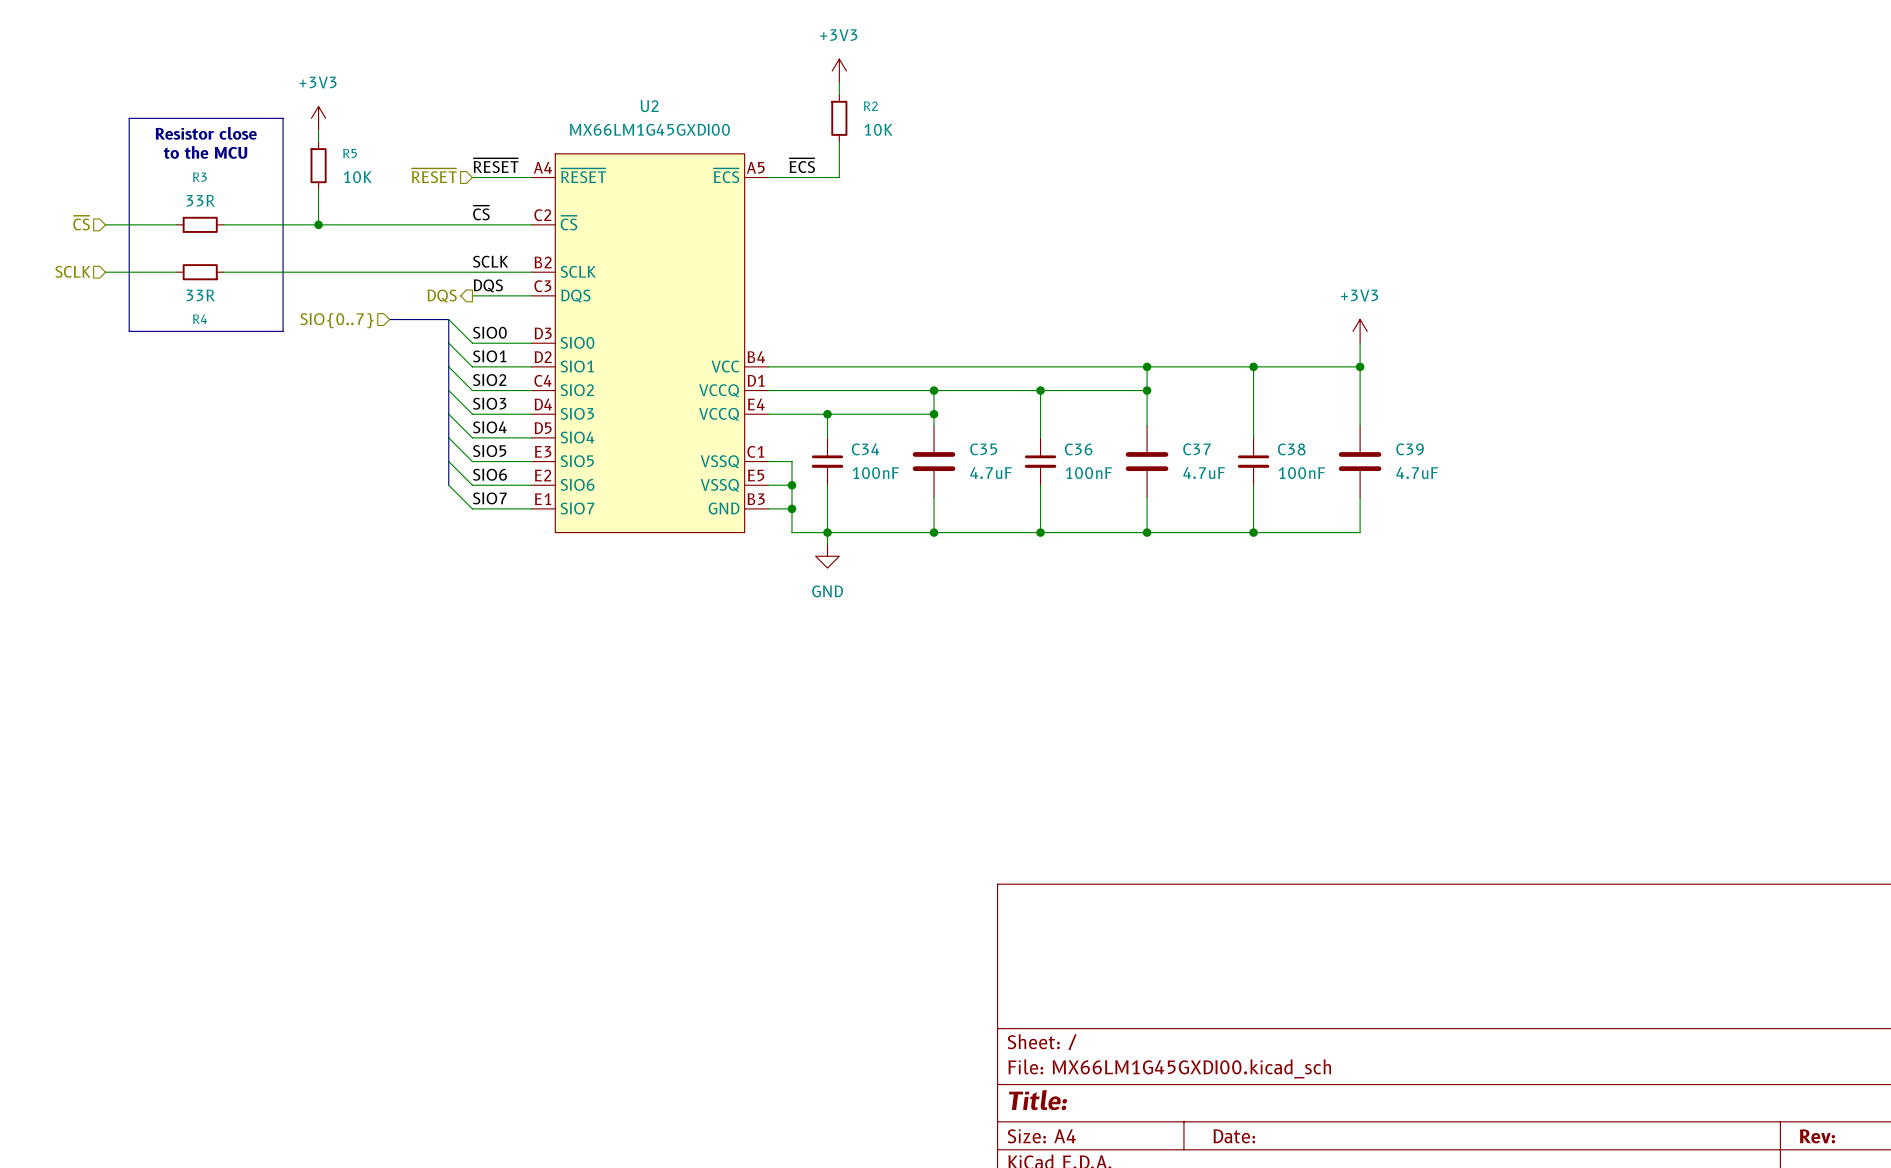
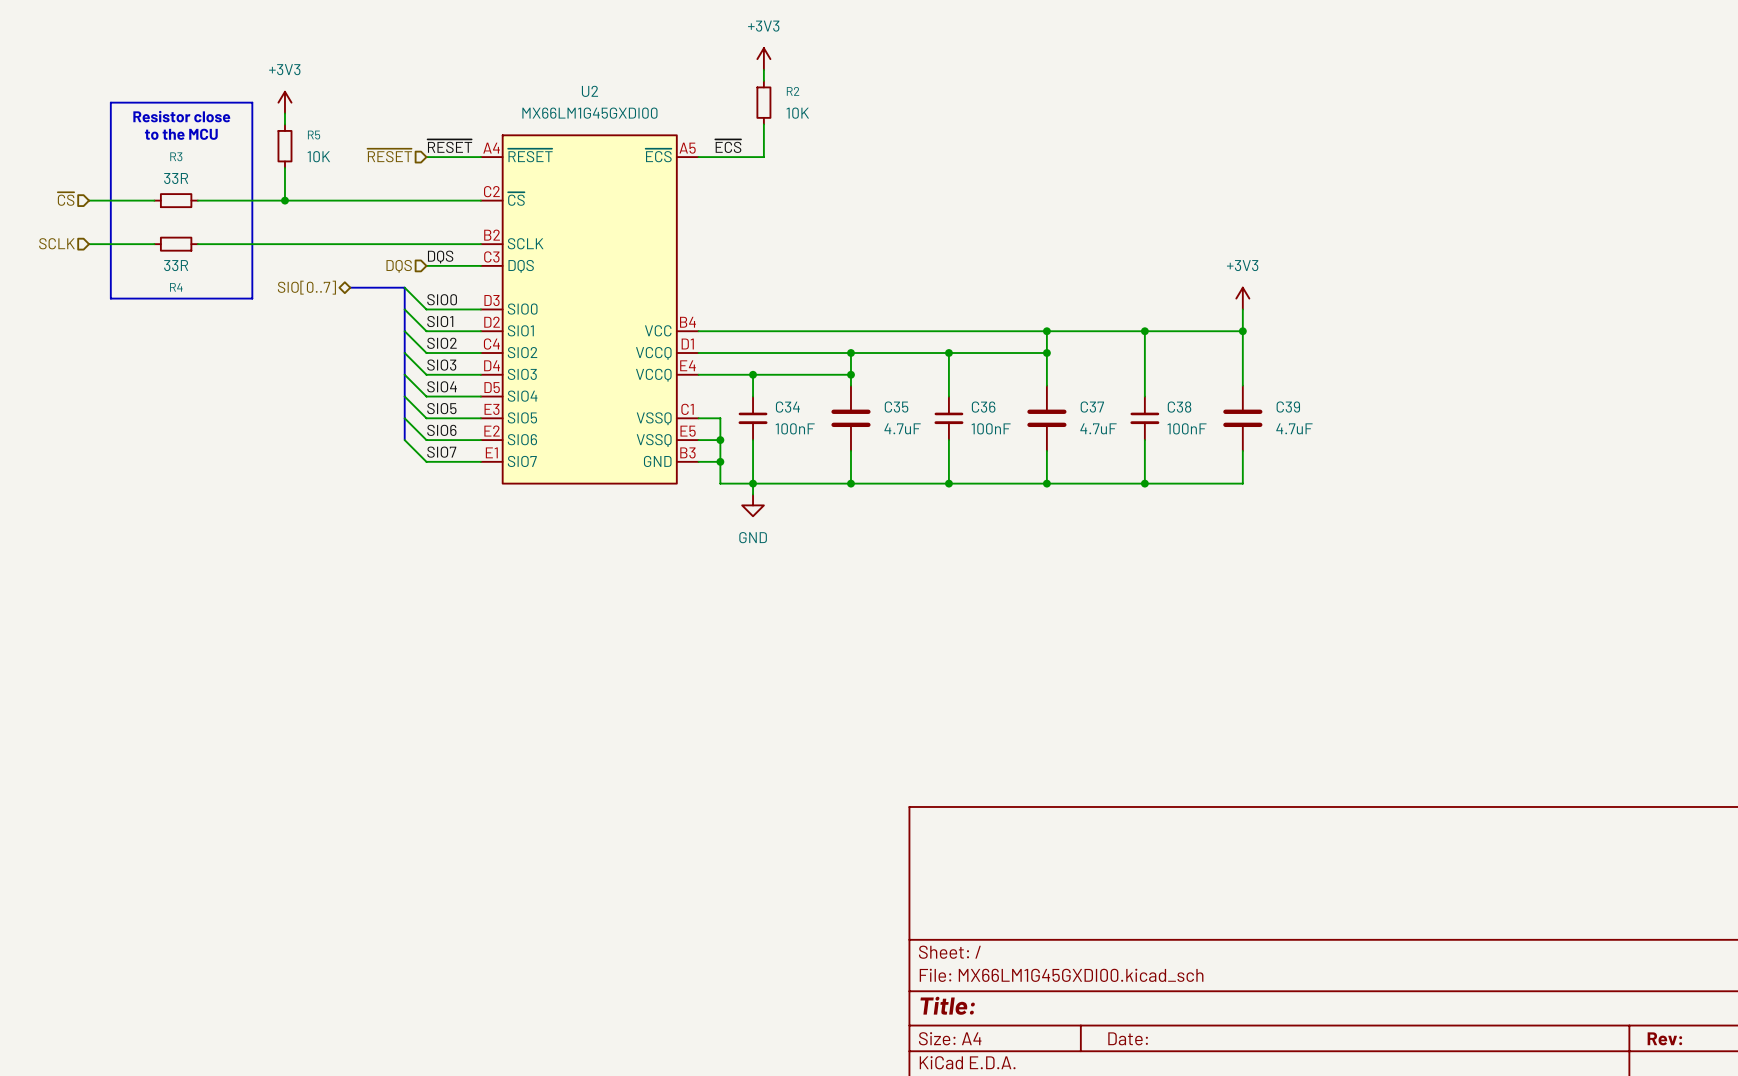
label: ~{CS} (481, 213) -> none
label: SCLK (490, 261) -> none
hierarchical label shape: output (442, 296) -> input (399, 266)
hierarchical label shape: input (337, 320) -> bidirectional (306, 287)
hierarchical label: SIO{0..7} (337, 320) -> SIO[0..7] (306, 287)

